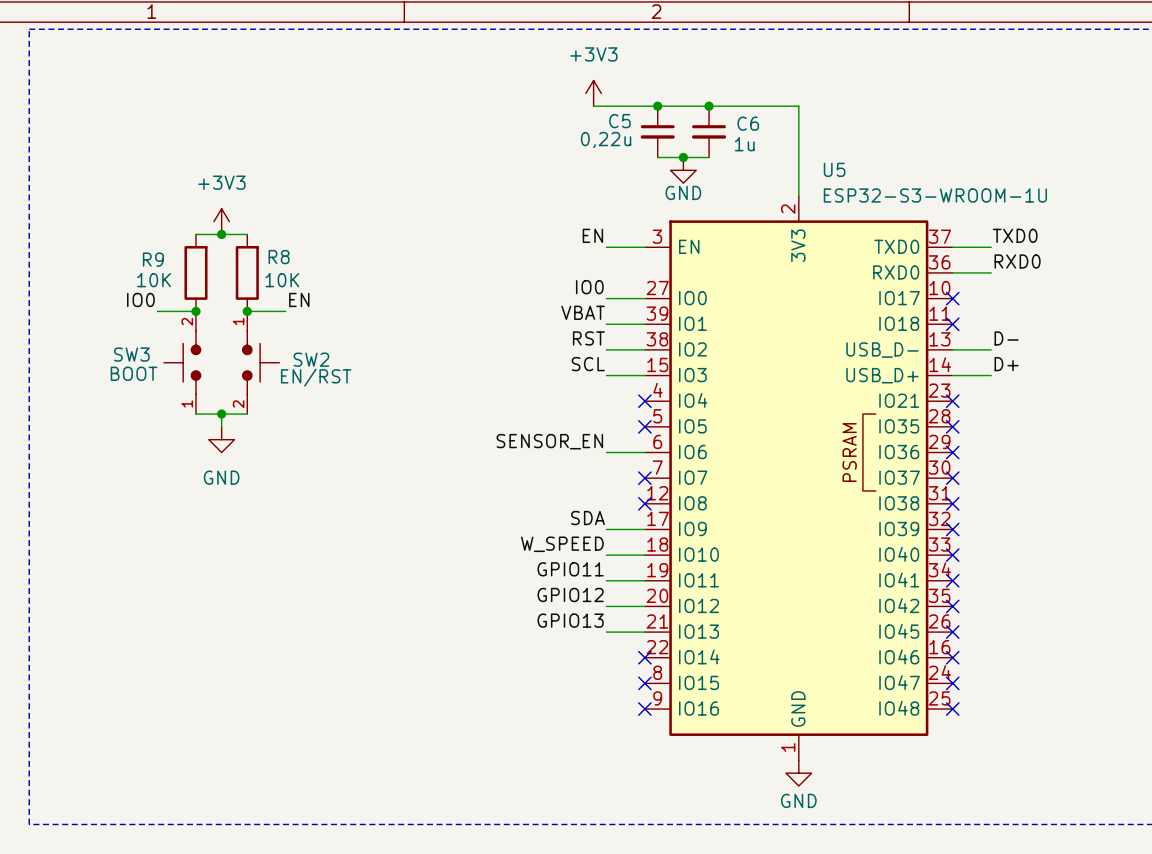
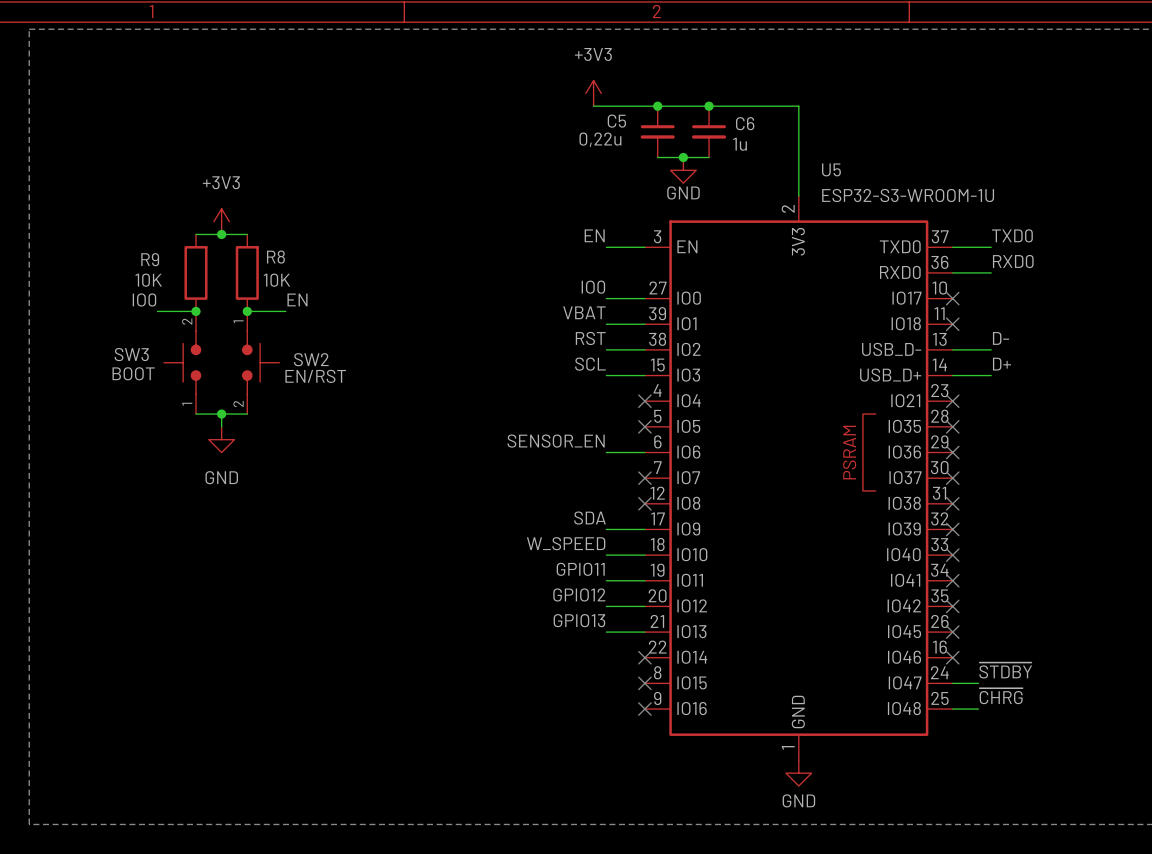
label: none -> ~{STDBY} (1005, 670)
wire: none -> (952, 683) (978, 683)
no-connect mark: (952, 683) -> none
label: none -> ~{CHRG} (1001, 696)
wire: none -> (952, 709) (978, 709)
no-connect mark: (952, 709) -> none

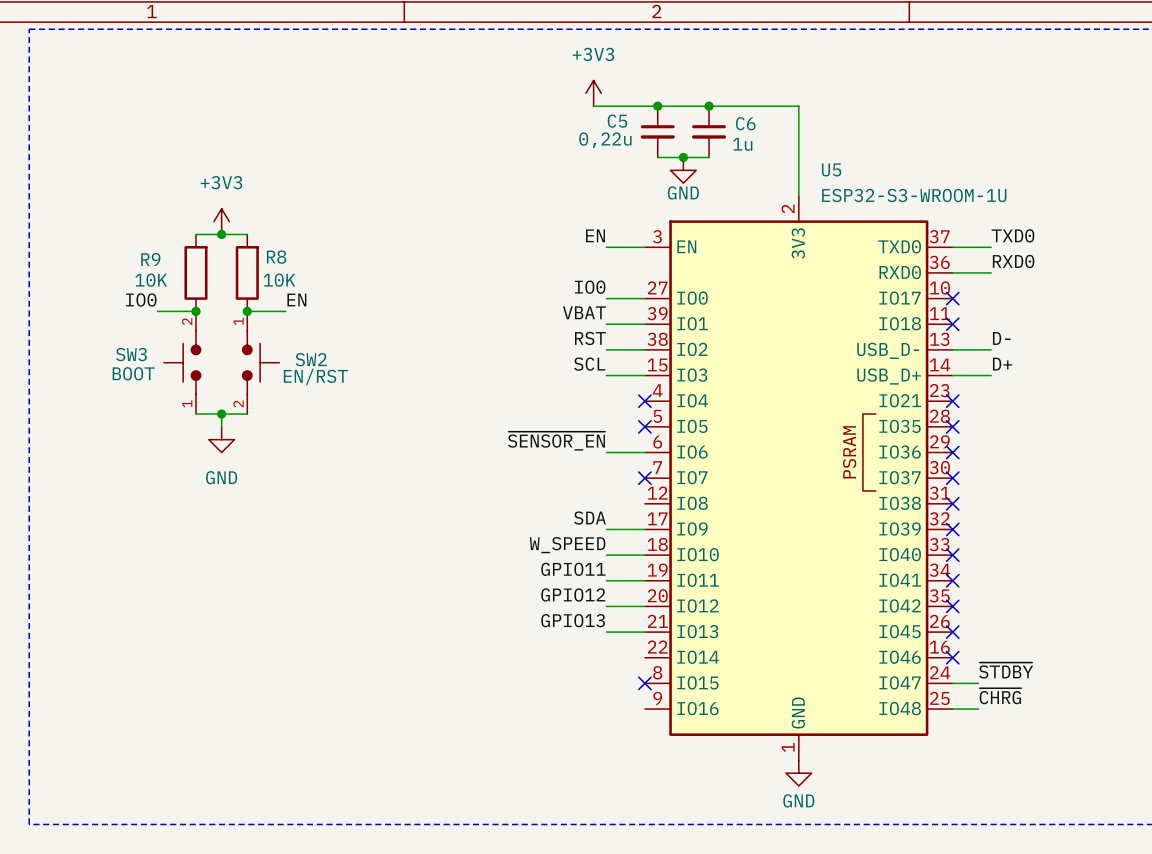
label: SENSOR_EN (556, 441) -> ~{SENSOR_EN} (556, 441)
no-connect mark: (644, 503) -> none
no-connect mark: (644, 657) -> none
no-connect mark: (644, 709) -> none

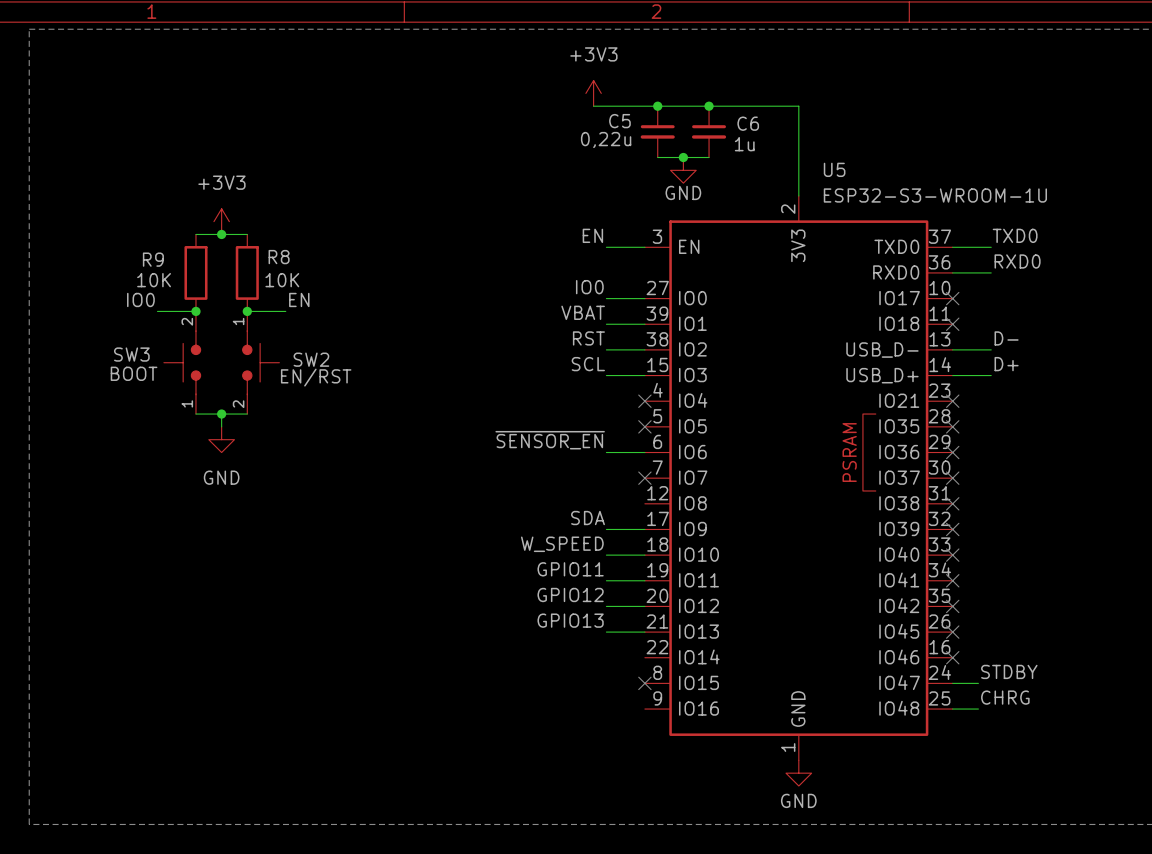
label: ~{STDBY} (1006, 670) -> STDBY (1009, 671)
label: ~{CHRG} (1000, 696) -> CHRG (1005, 697)

